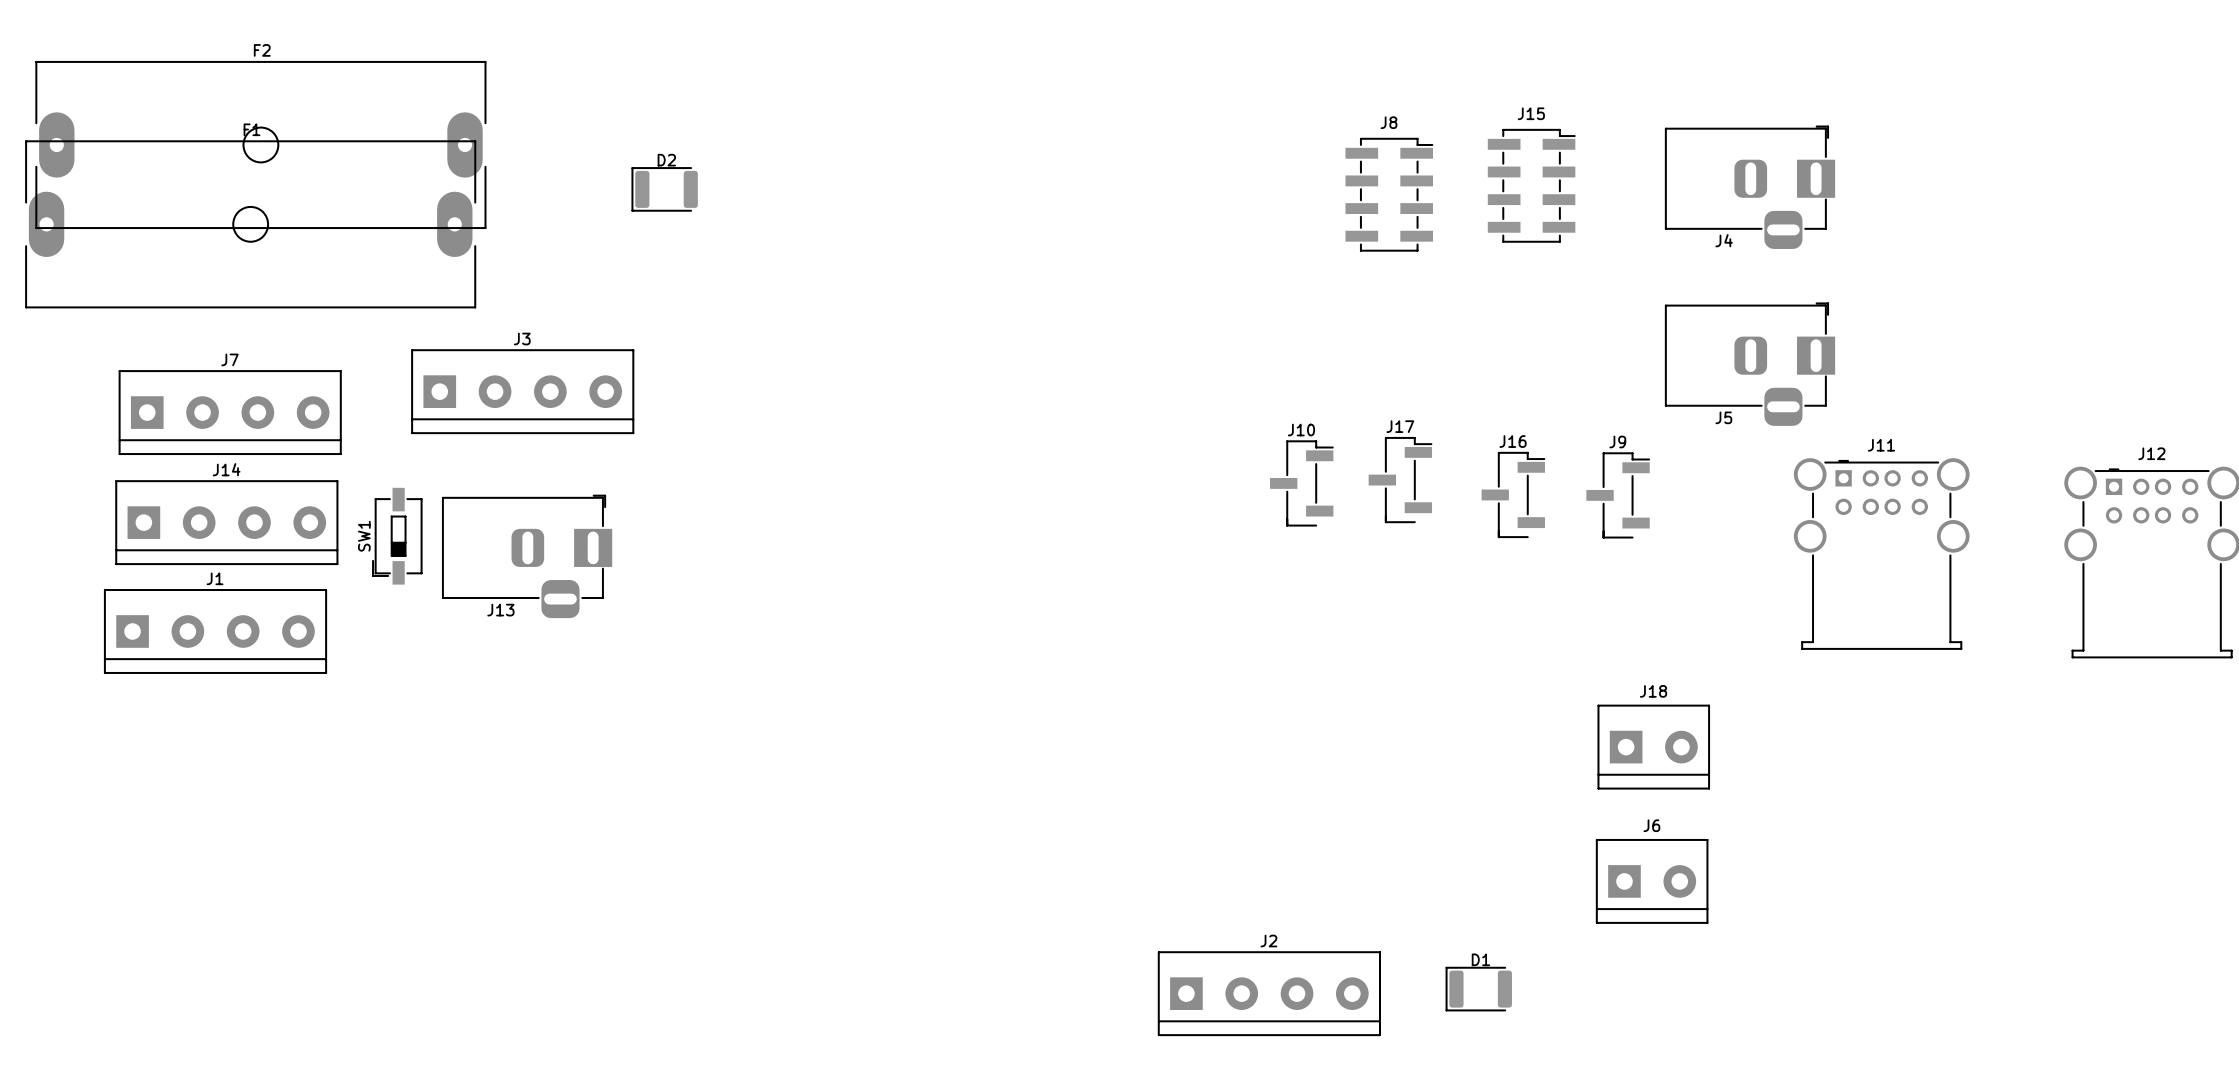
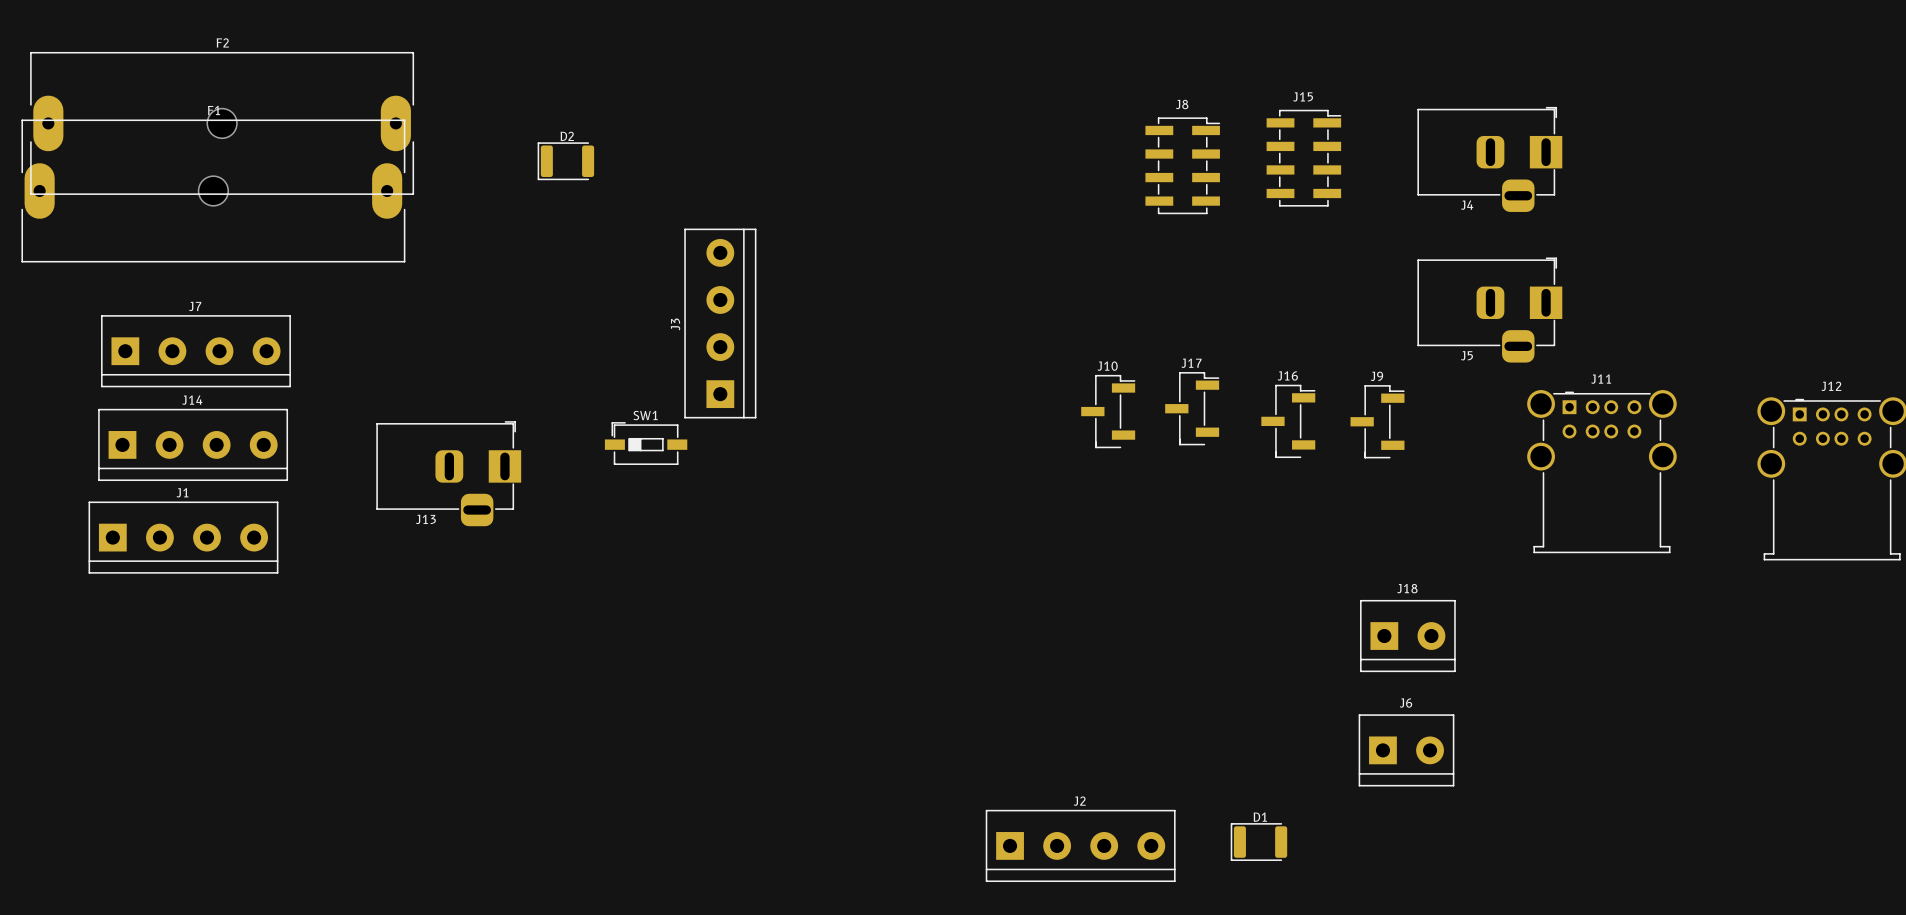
J3 rotation: 0° (522, 391) -> 90° counterclockwise (720, 323)
J3 position: (522, 391) -> (720, 323)
SW1 rotation: 0° (397, 536) -> 90° clockwise (646, 443)
SW1 position: (397, 536) -> (646, 443)

